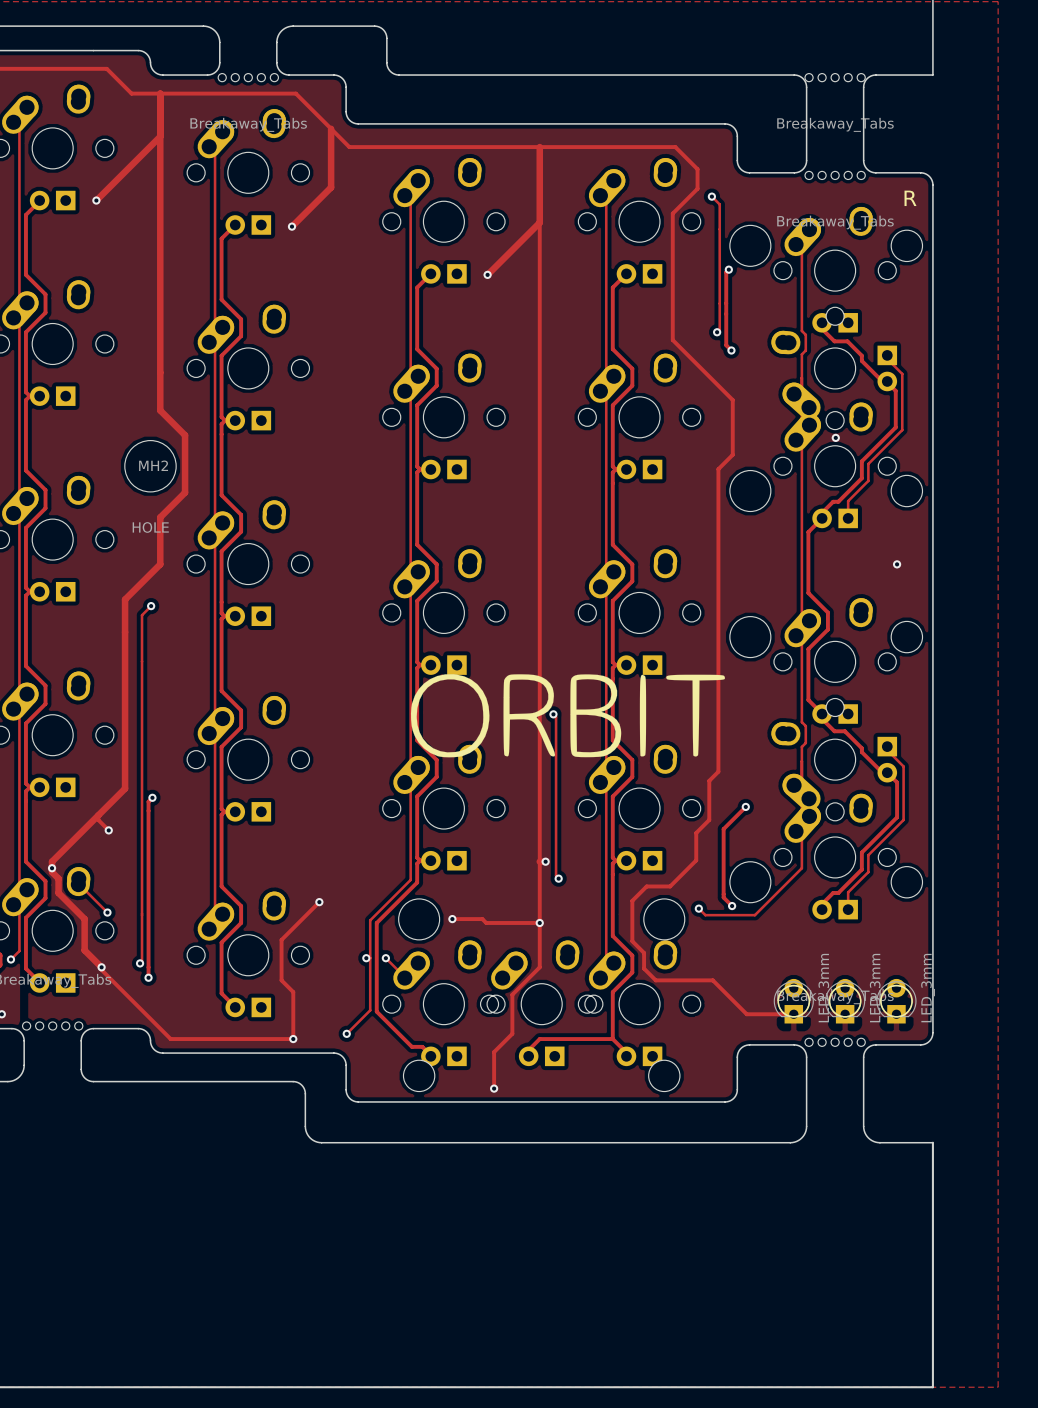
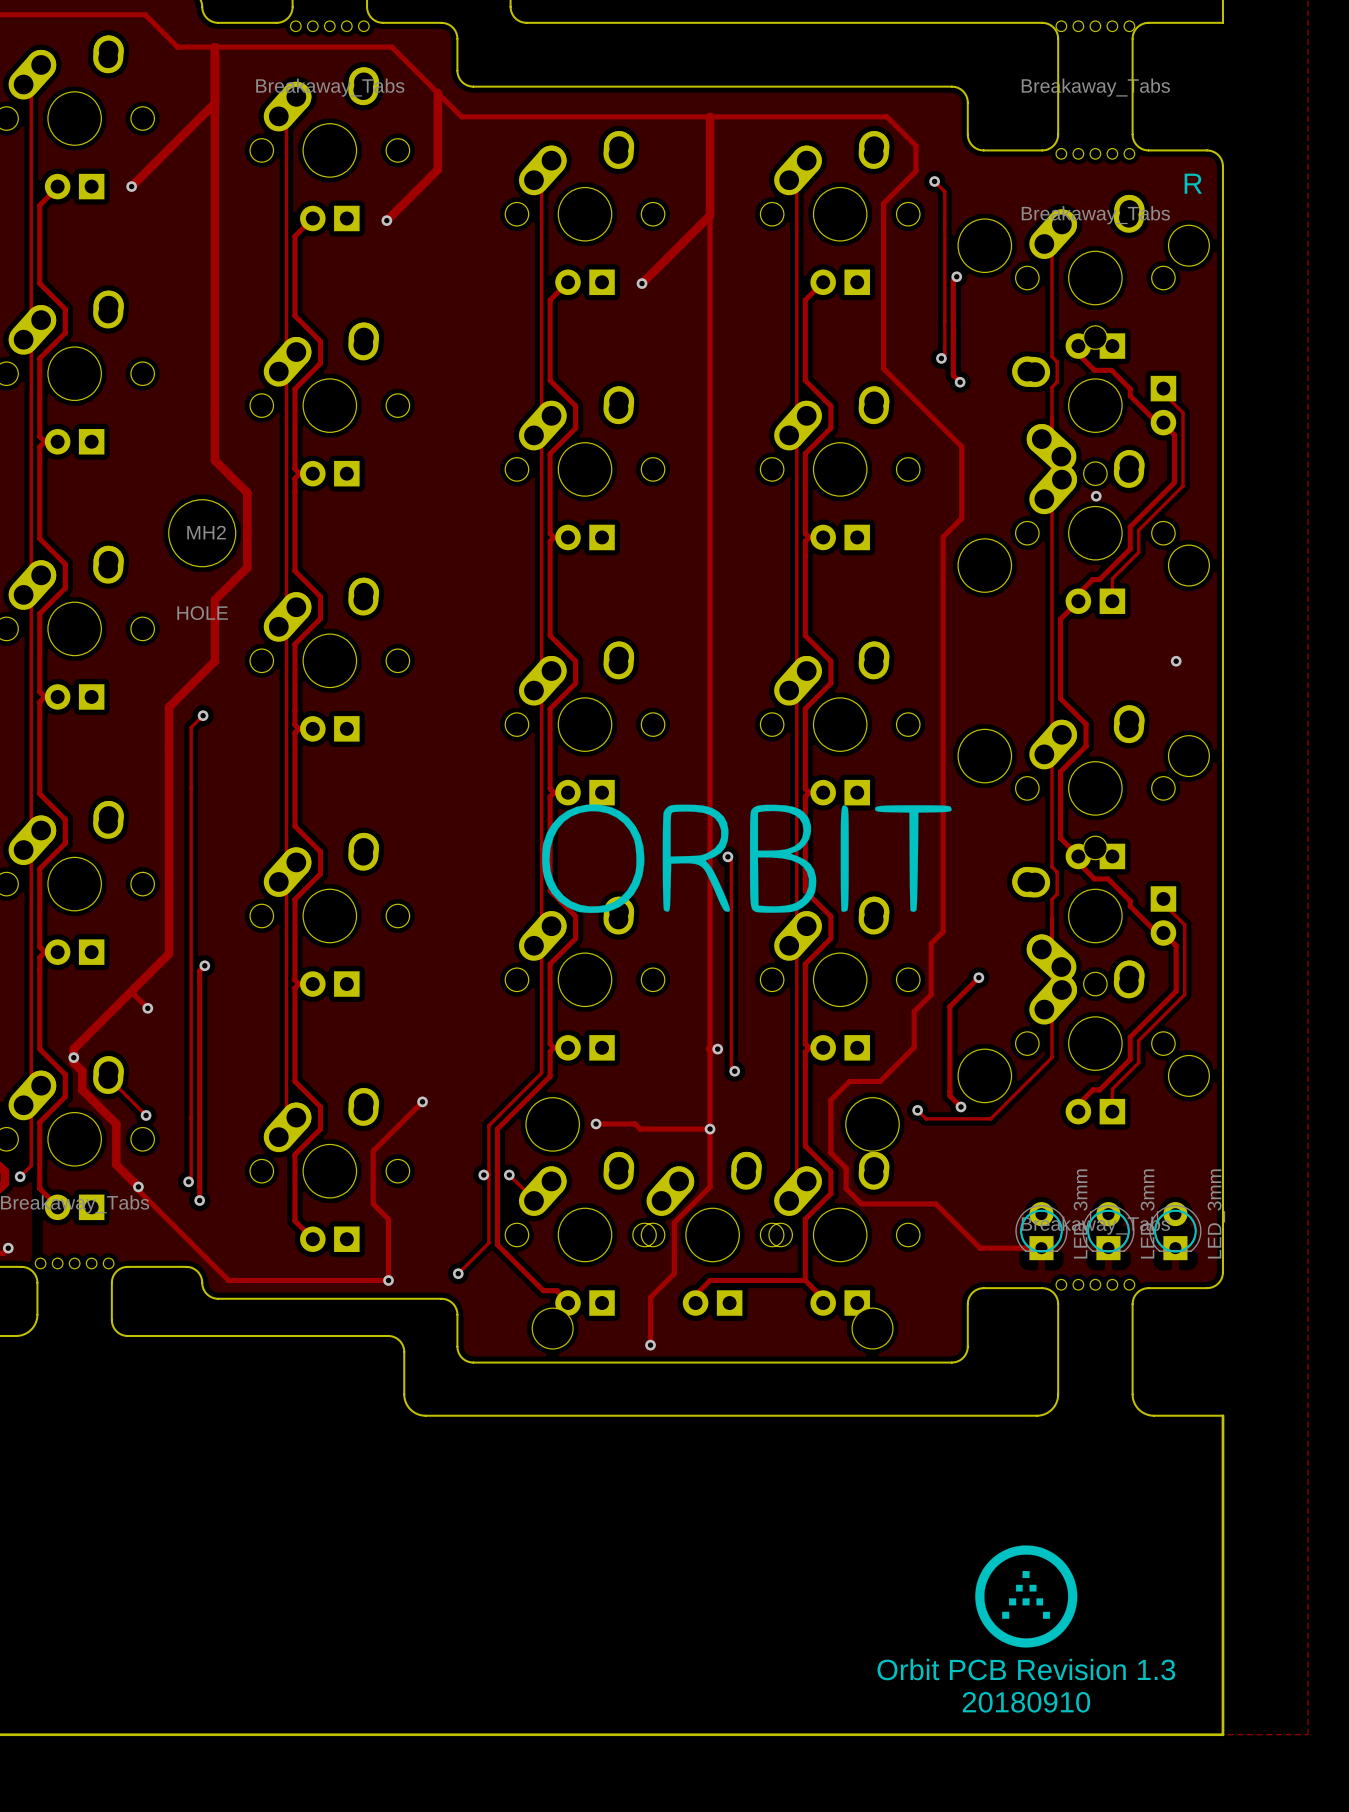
drawing: none -> [975, 1545, 1078, 1648]
text: none -> Orbit PCB Revision 1.3 (1026, 1669)
text: none -> 20180910 (1026, 1702)

